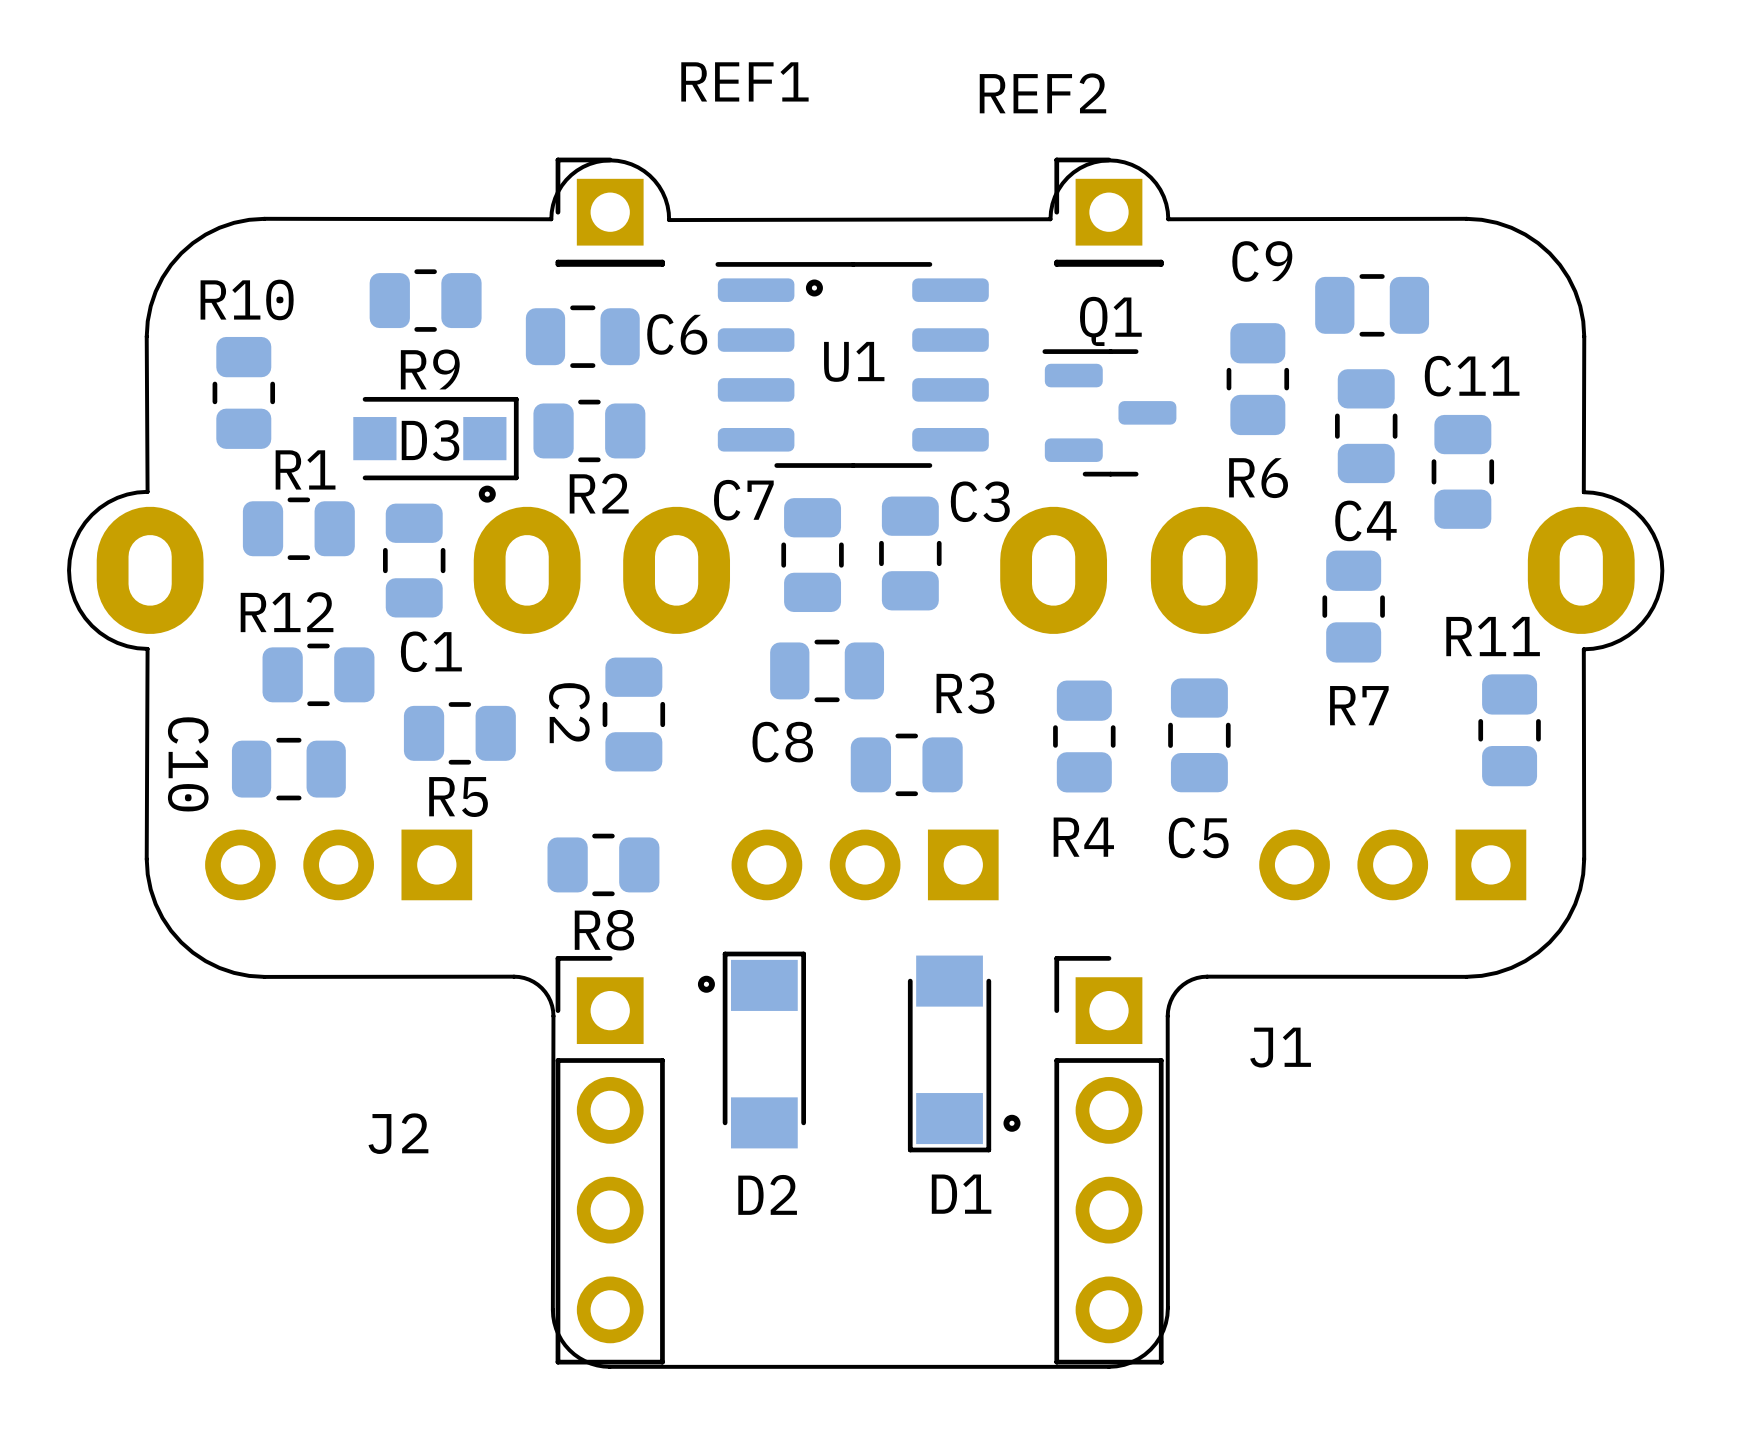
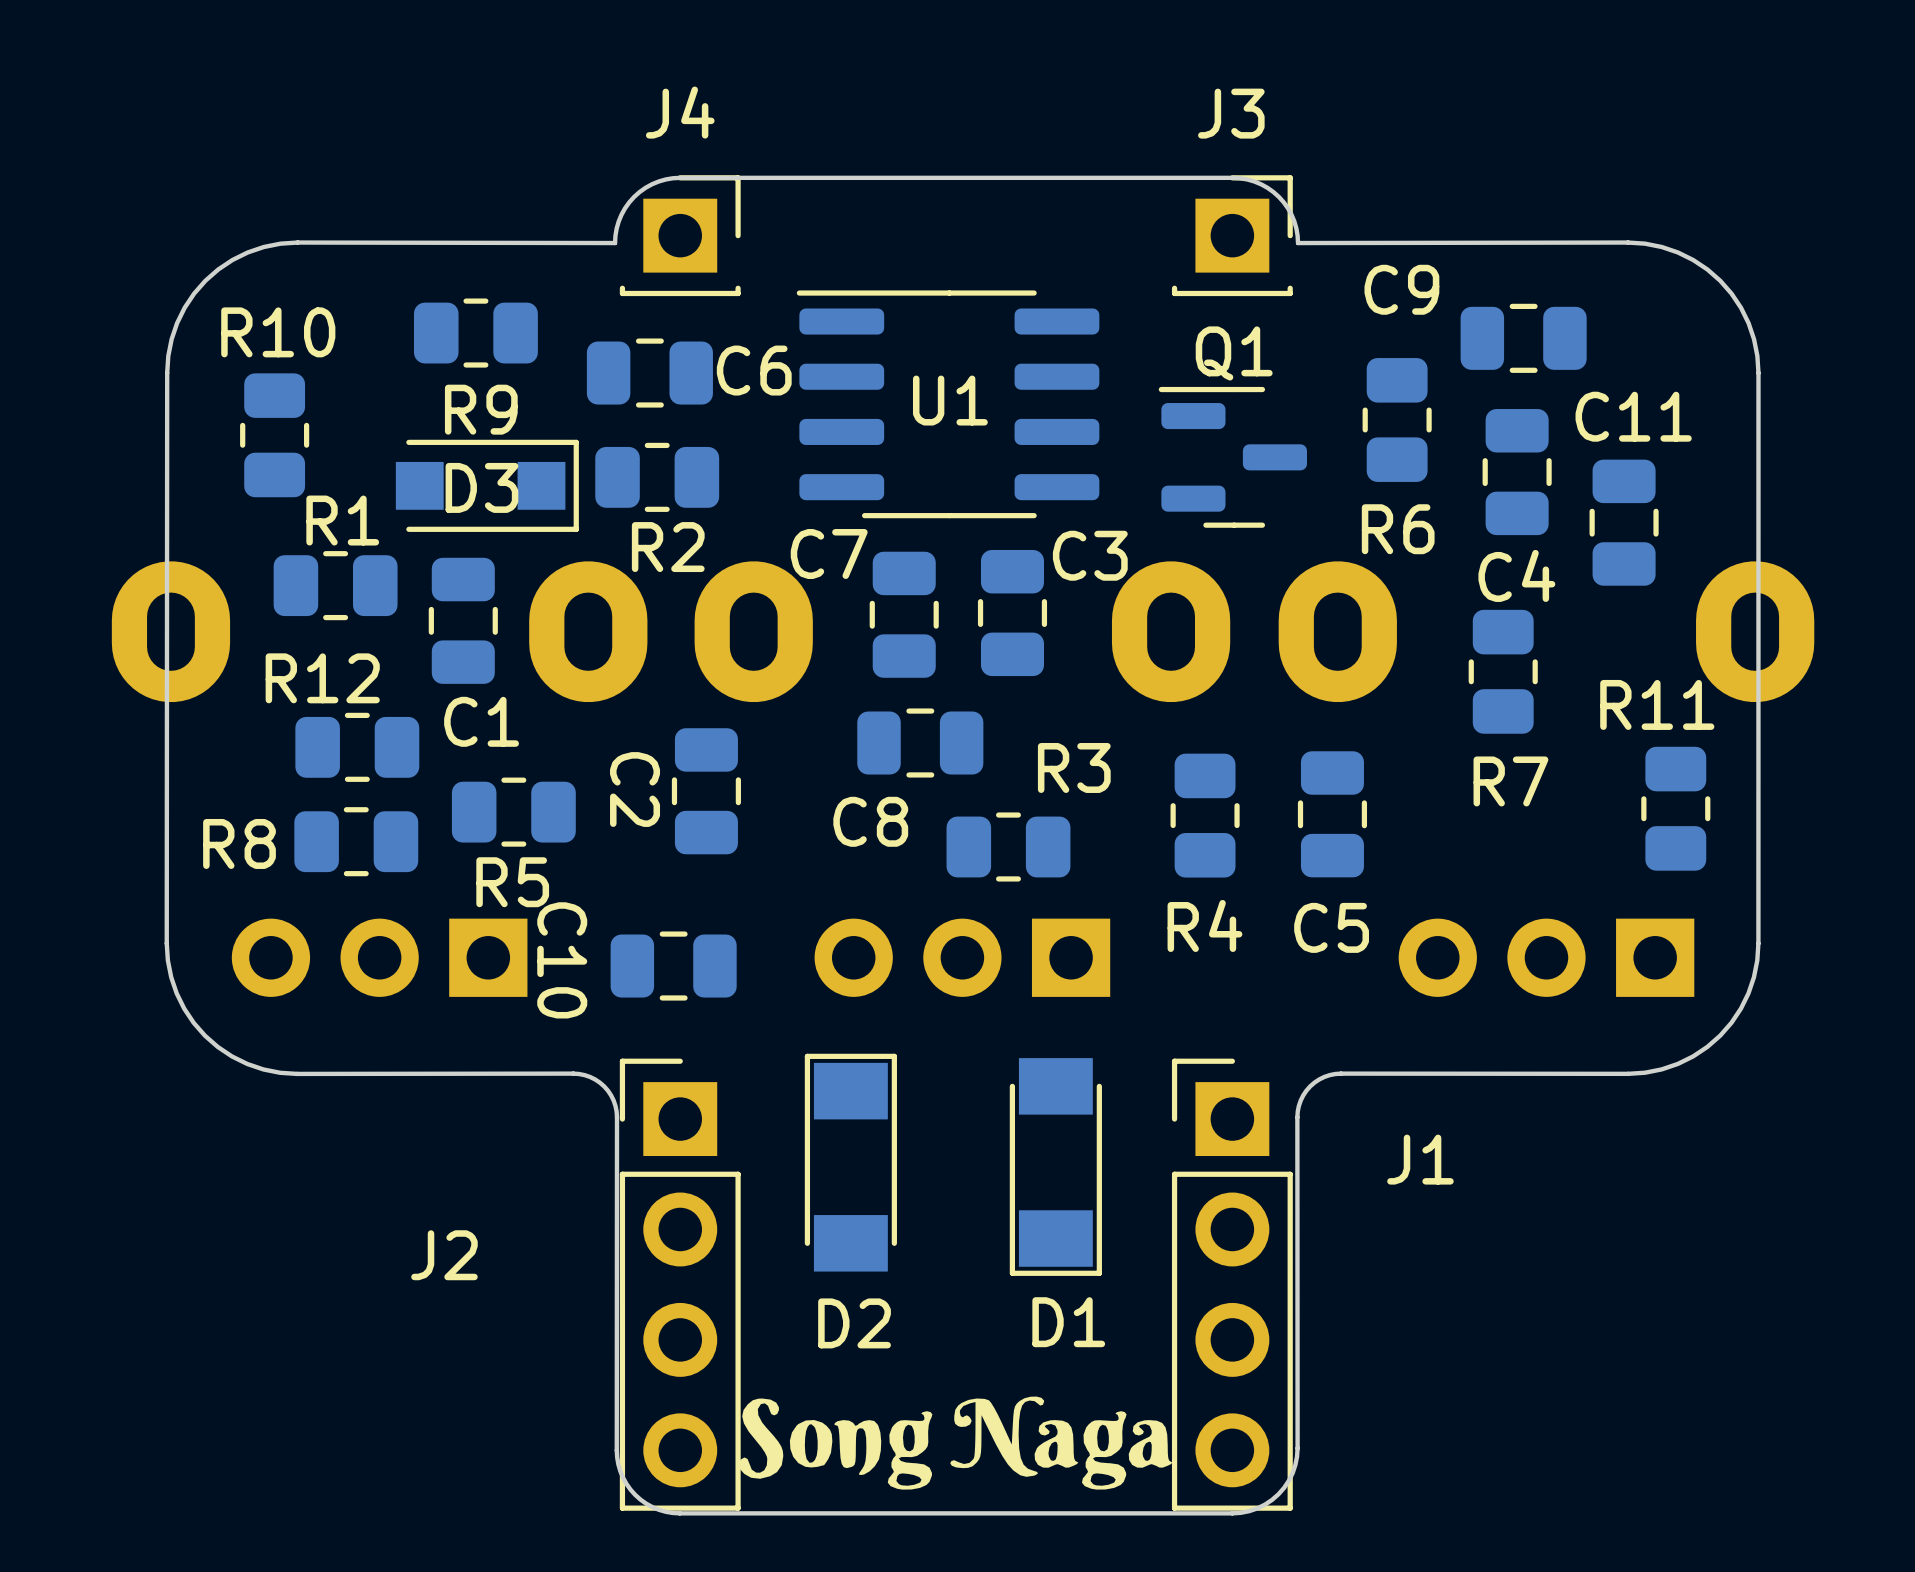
REF1: (610, 212) -> none
J4: none -> (680, 235)
REF2: (1108, 212) -> none
J3: none -> (1232, 235)
board edge: (1168, 219) (1163, 196) (1151, 177) (1131, 164) (1109, 160) (1086, 164) (1067, 177) (1054, 196) (1050, 219) (669, 220) (665, 199) (654, 180) (638, 167) (624, 162) (610, 160) (589, 164) (576, 170) (566, 180) (555, 198) (551, 219) -> (1298, 243) (1294, 221) (1288, 208) (1278, 196) (1267, 187) (1254, 181) (1232, 177) (672, 178) (651, 184) (634, 196) (621, 214) (616, 228) (615, 243)
drawing: [805, 279, 823, 297] -> none
board edge: (146, 336) (147, 491) (117, 497) (92, 514) (75, 540) (69, 570) (75, 600) (92, 625) (117, 642) (147, 648) (146, 859) (150, 889) (155, 904) (162, 917) (181, 942) (205, 961) (234, 972) (264, 976) (513, 976) (529, 979) (541, 988) (550, 1001) (553, 1016) (552, 1309) -> (167, 373) (166, 943) (171, 977) (176, 993) (193, 1022) (217, 1046) (232, 1056) (263, 1069) (297, 1073) (573, 1073) (590, 1076) (604, 1086) (613, 1100) (617, 1117) (616, 1450)
board edge: (1584, 336) (1583, 492) (1602, 494) (1620, 501) (1642, 518) (1657, 542) (1662, 570) (1657, 598) (1642, 622) (1628, 635) (1611, 644) (1583, 649) (1584, 859) (1580, 889) (1575, 904) (1559, 930) (1538, 952) (1525, 961) (1496, 972) (1466, 976) (1207, 976) (1192, 979) (1179, 988) (1170, 1001) (1167, 1016) (1167, 1307) -> (1758, 373) (1758, 943) (1753, 977) (1748, 993) (1731, 1022) (1707, 1046) (1693, 1056) (1661, 1069) (1627, 1073) (1341, 1073) (1324, 1076) (1310, 1086) (1300, 1100) (1297, 1117) (1297, 1448)
drawing: [478, 485, 496, 503] -> none
C10 position: (288, 769) -> (673, 966)
R8 position: (603, 864) -> (356, 841)
R8 name position: R8 (604, 930) -> R8 (239, 843)
drawing: [697, 975, 715, 993] -> none
drawing: [1003, 1114, 1021, 1132] -> none
drawing: none -> [738, 1396, 1173, 1490]

